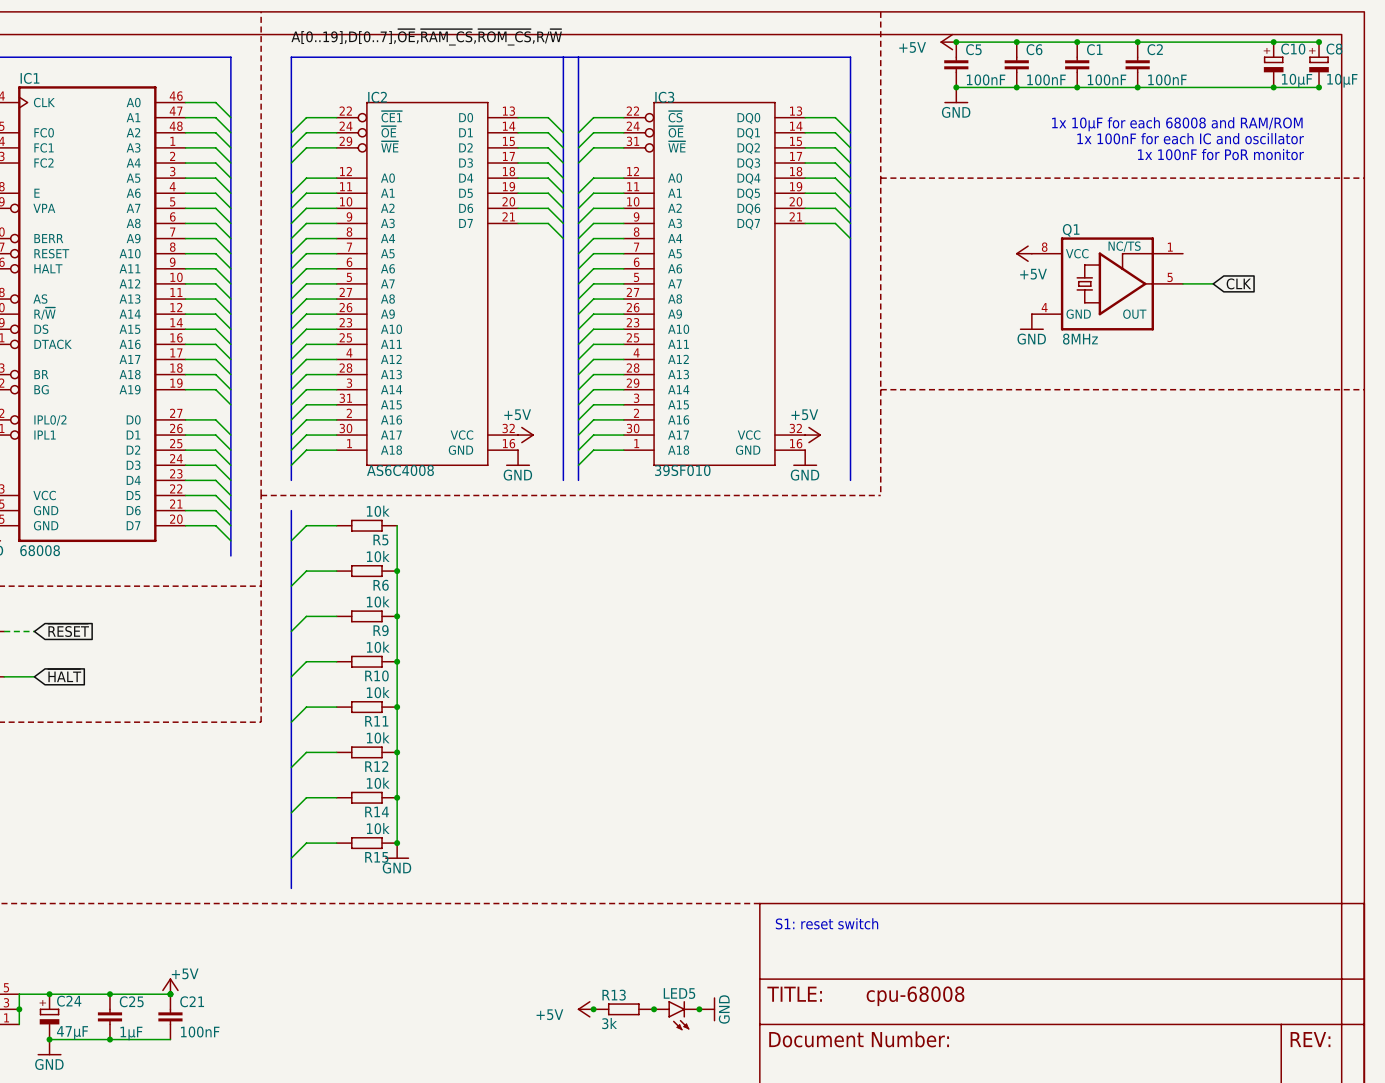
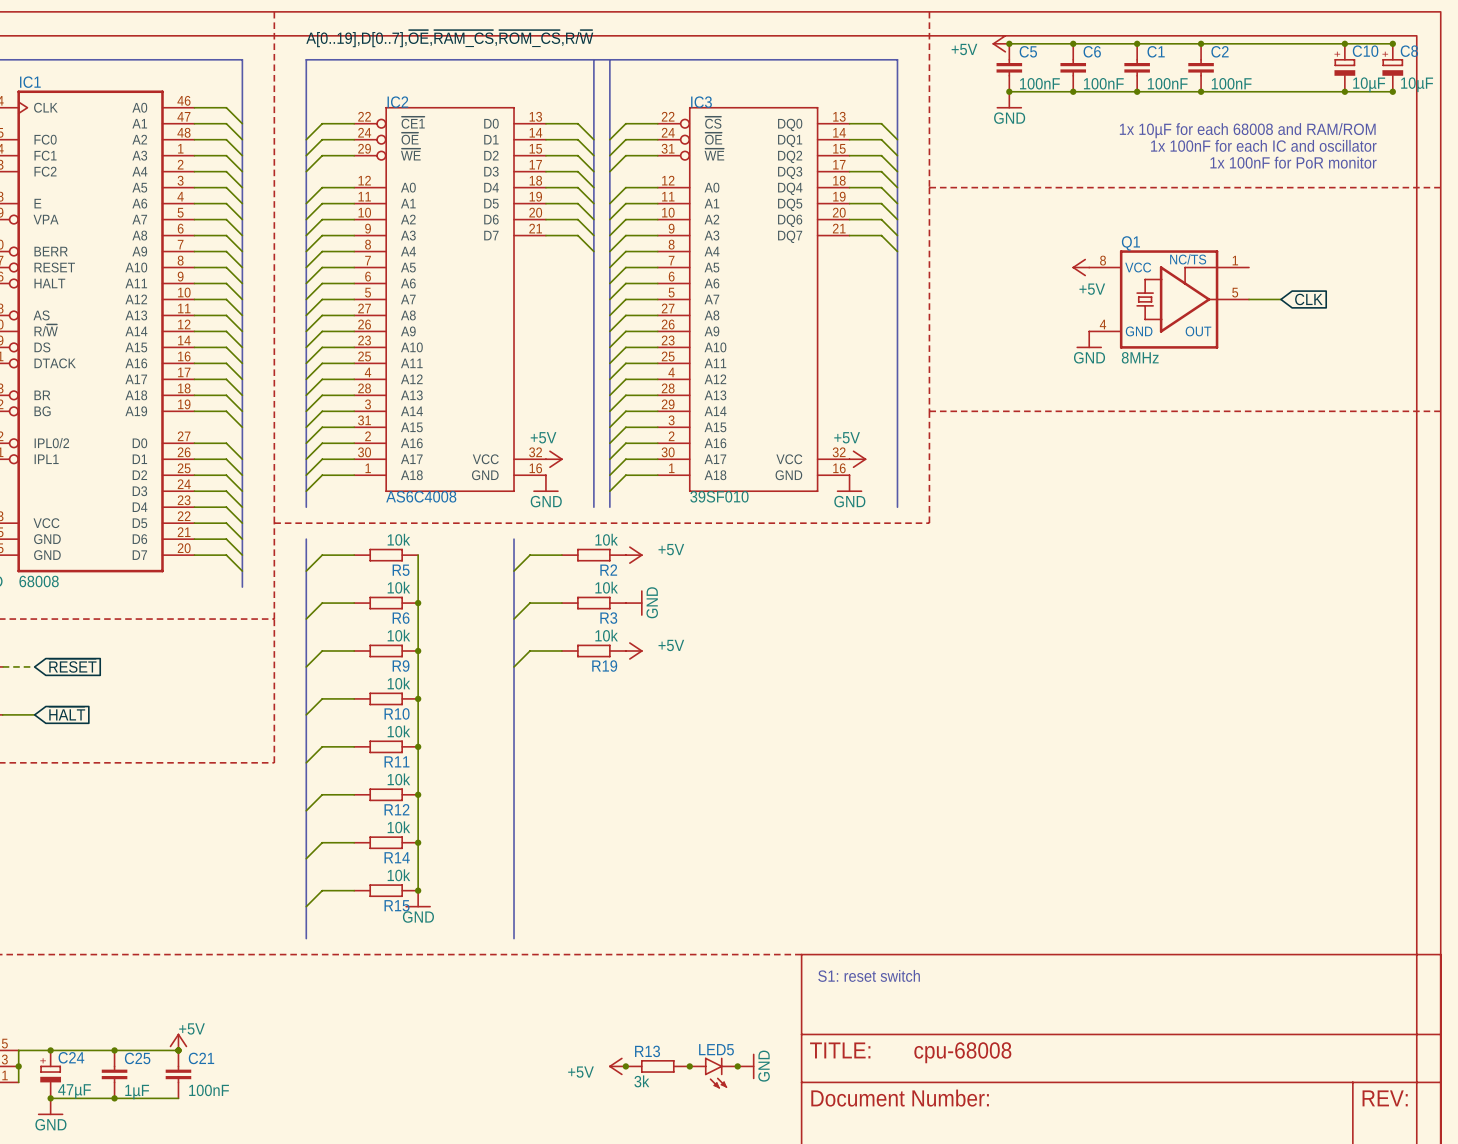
bus: none -> (514, 539) (514, 938)
wire: none -> (561, 555) (529, 555) (514, 571)
R2: none -> 10k (593, 555)
power symbol: none -> +5V (634, 555)
wire: none -> (561, 603) (529, 603) (514, 619)
R3: none -> 10k (593, 603)
power symbol: none -> GND (634, 603)
wire: none -> (561, 650) (529, 650) (514, 666)
R19: none -> 10k (593, 650)
power symbol: none -> +5V (634, 650)

